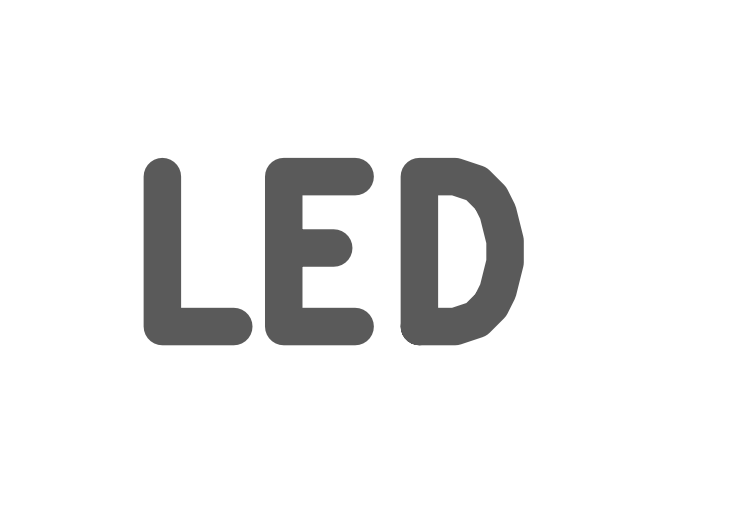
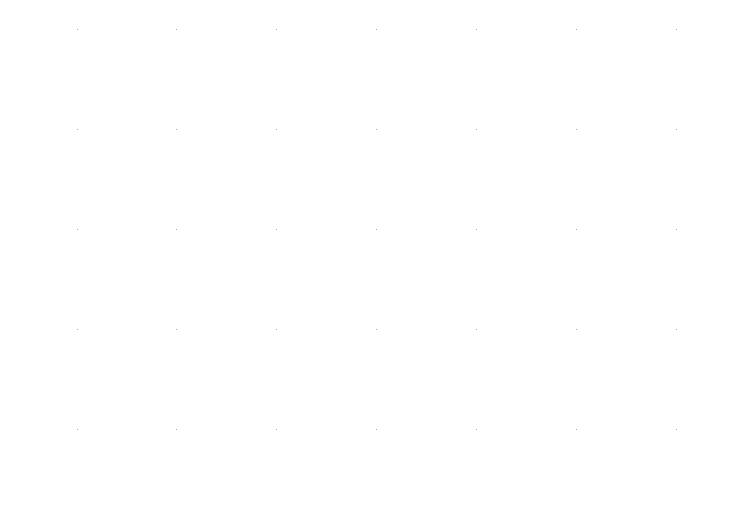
text: LED (333, 251) -> none

